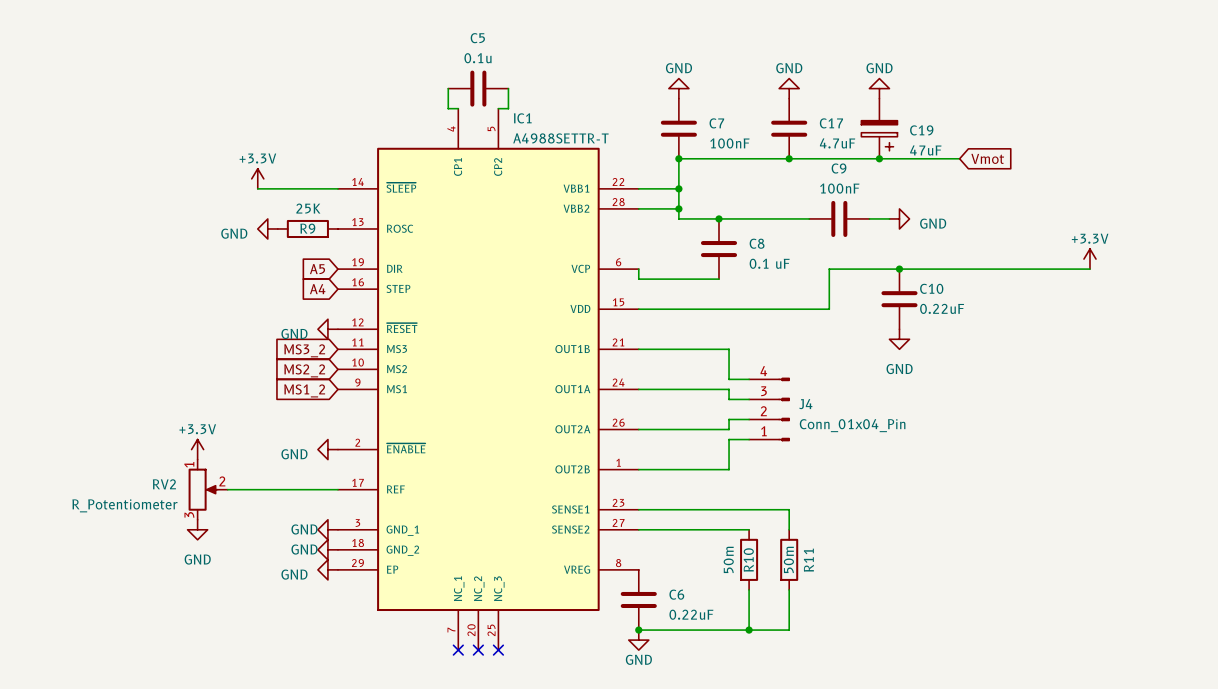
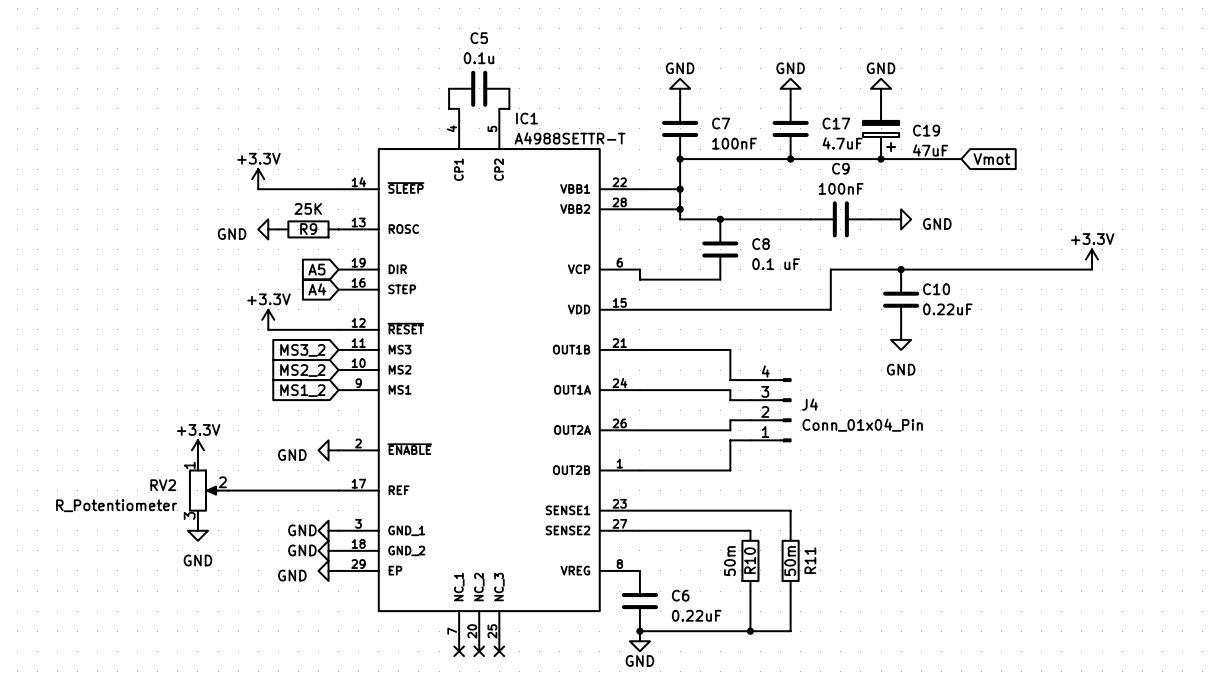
power symbol: none -> +3.3V (268, 319)
wire: none -> (268, 329) (338, 329)
power symbol: GND (327, 329) -> none

